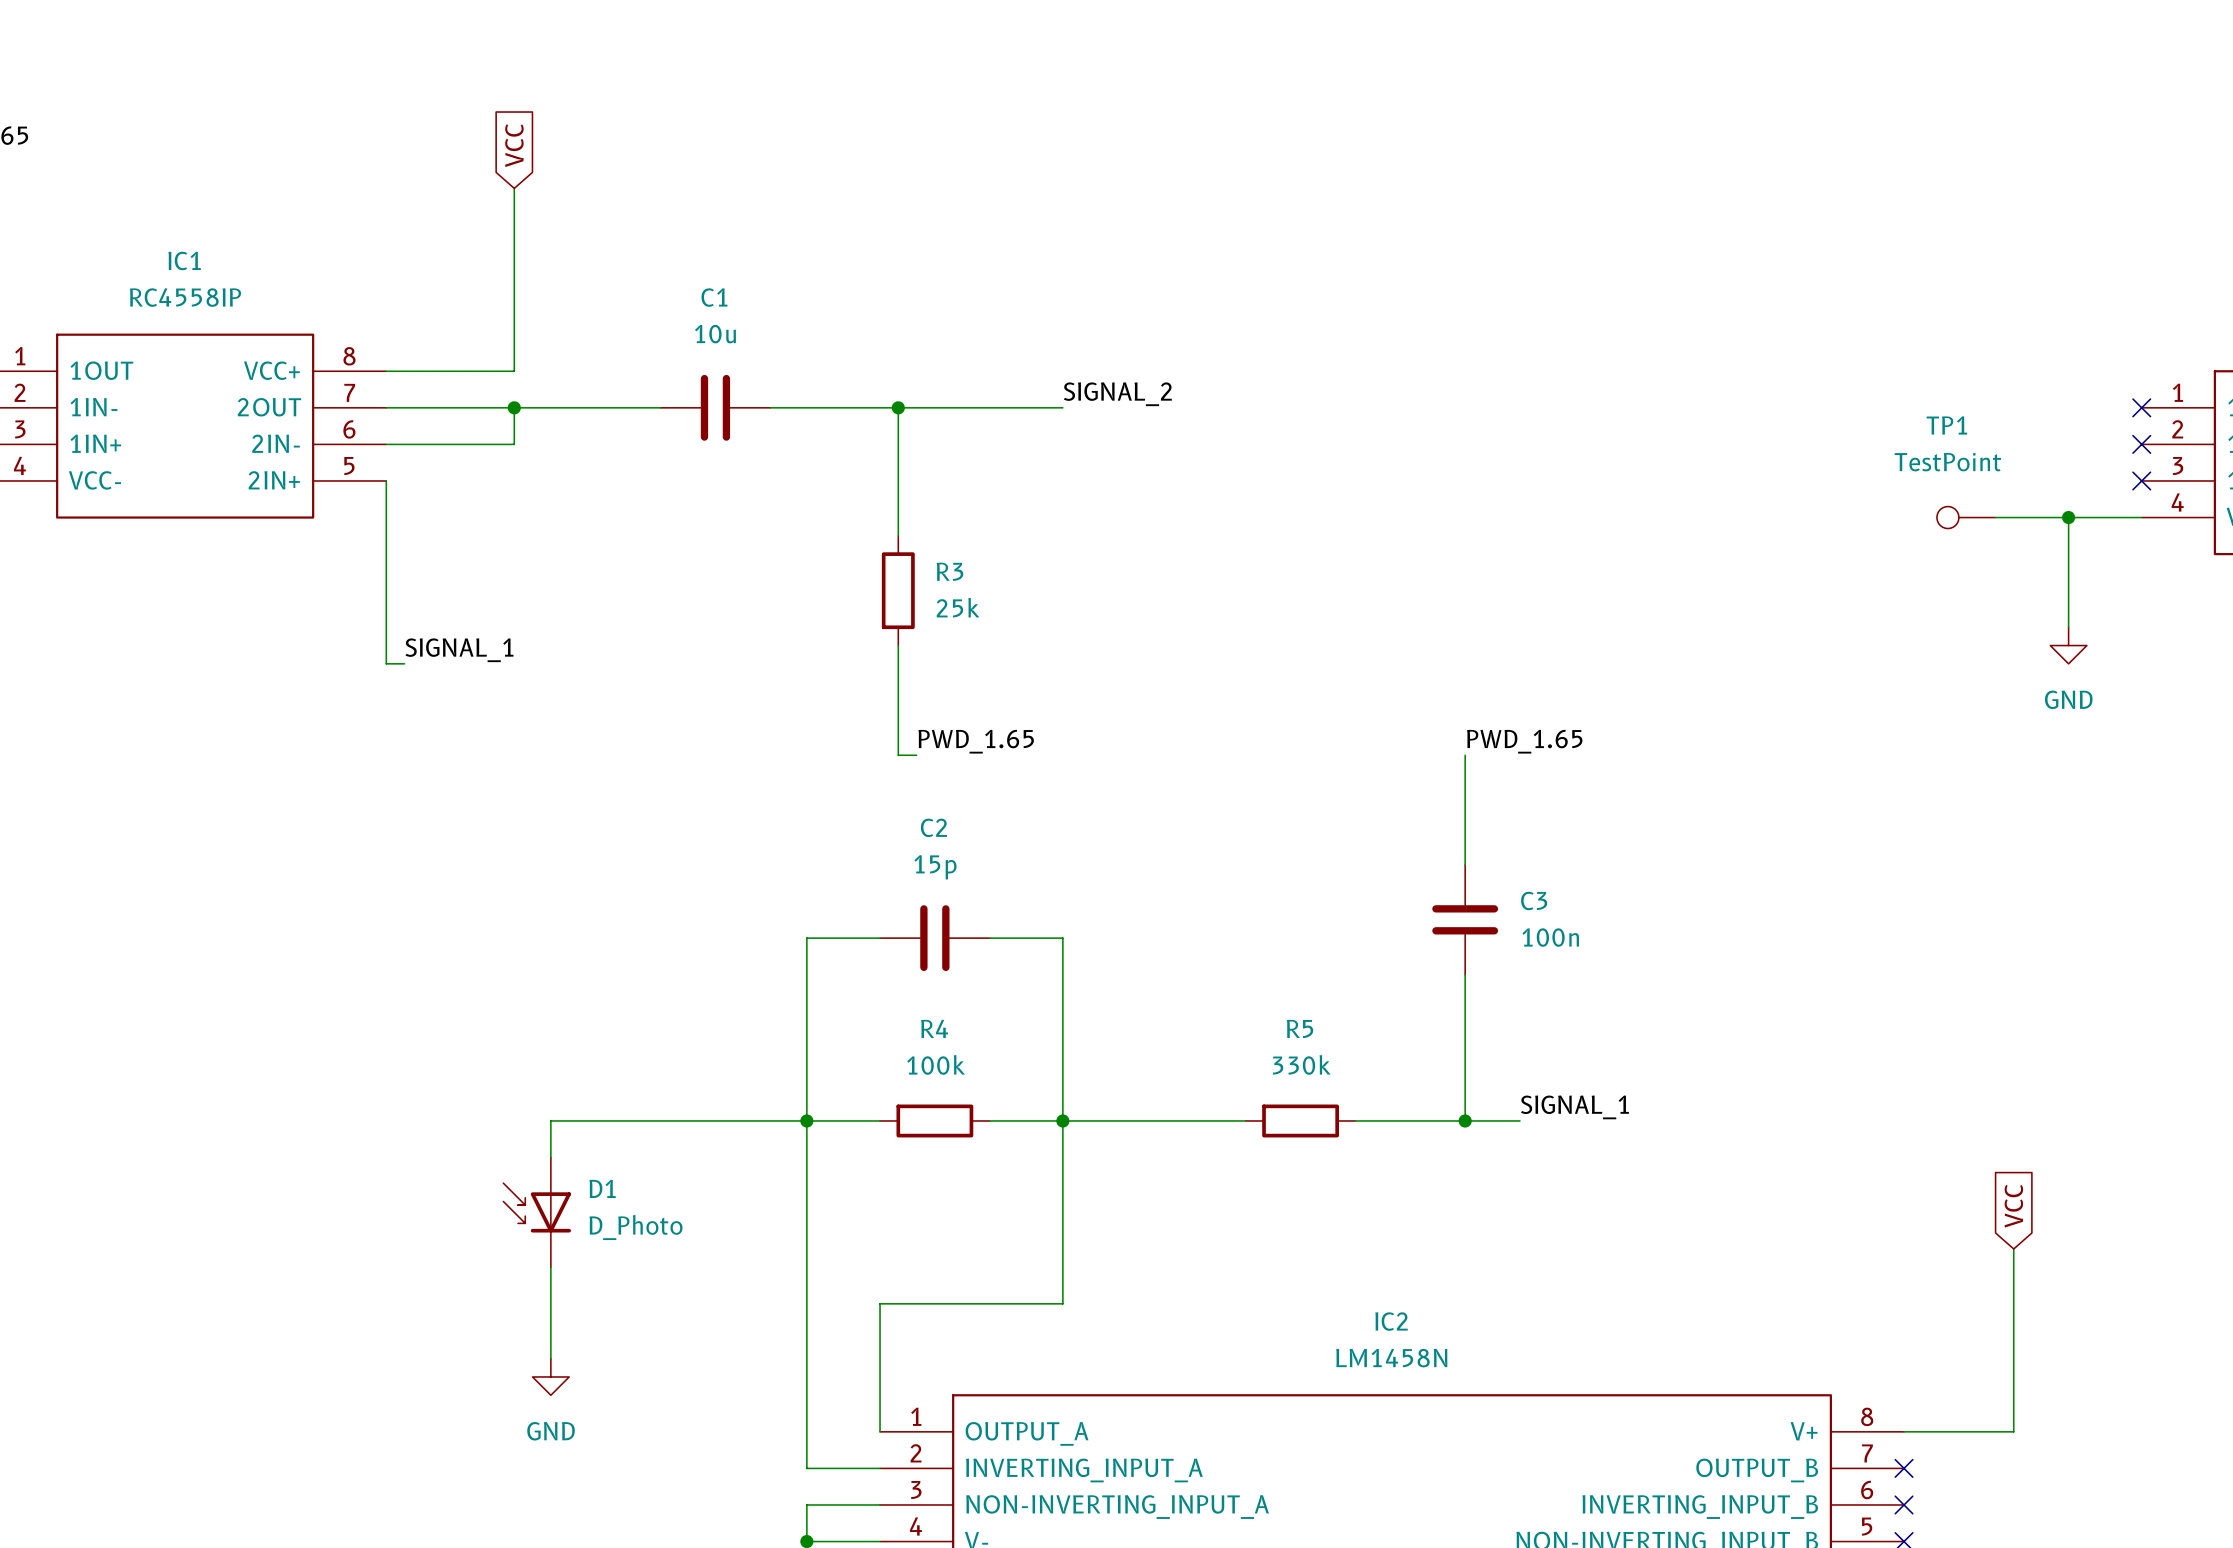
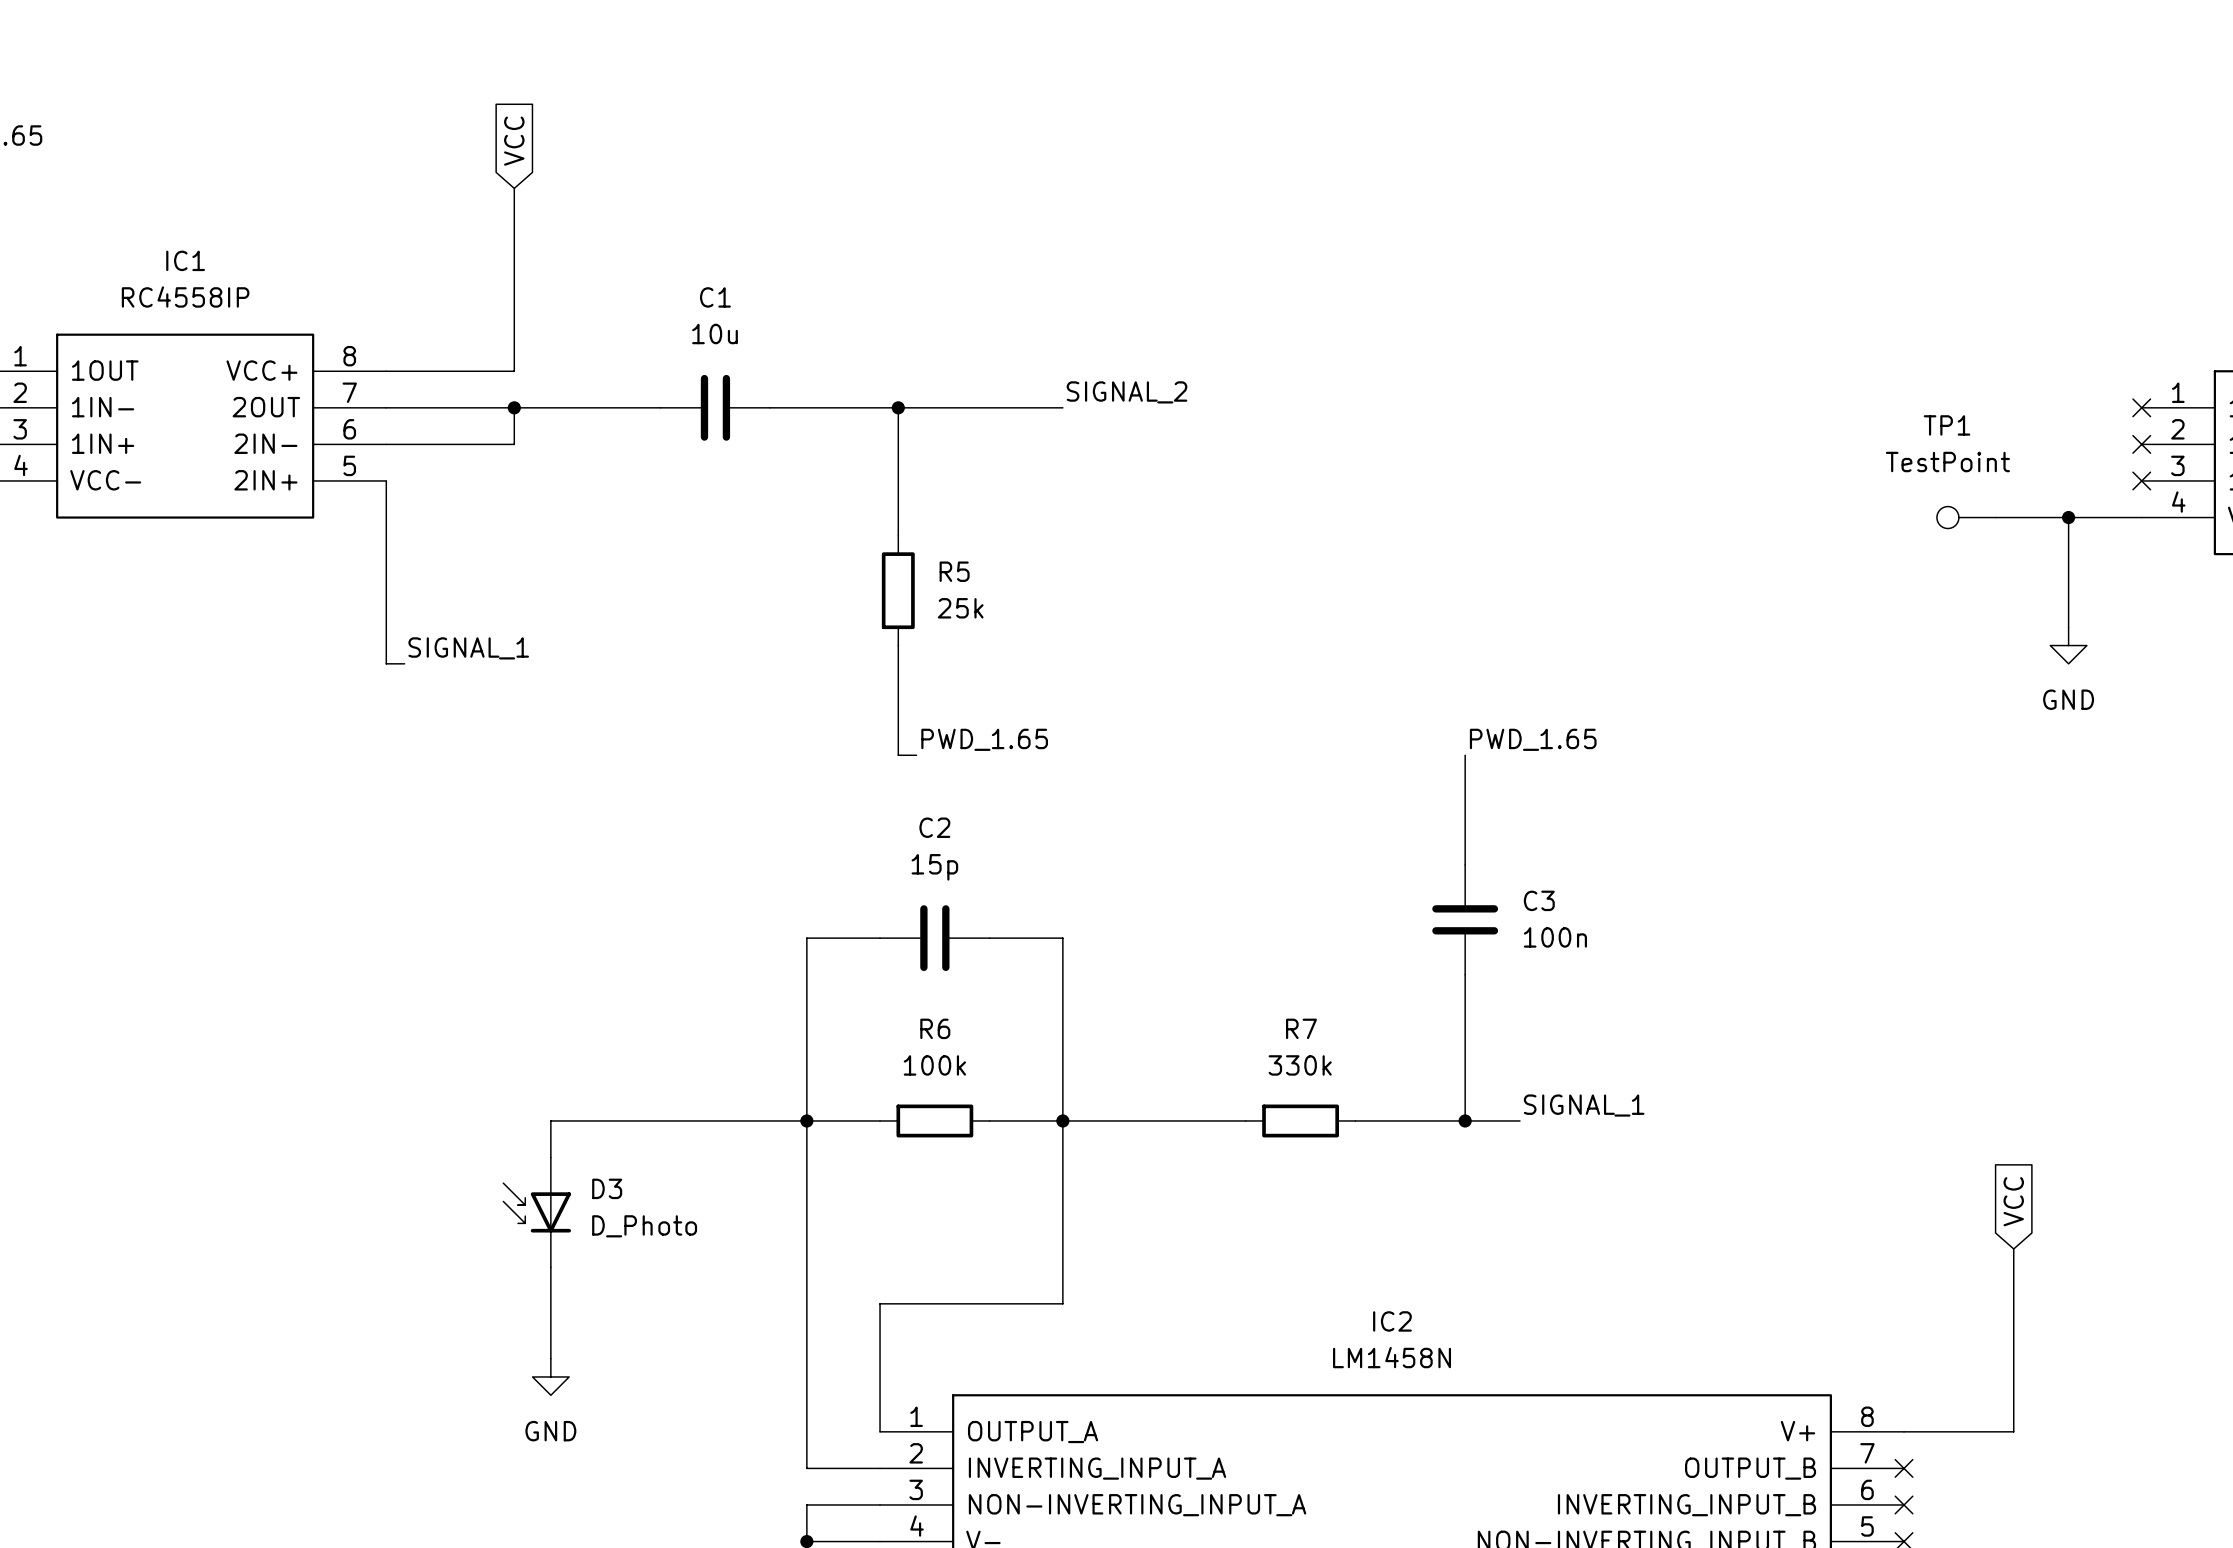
R3 name: R3 (949, 571) -> R5 (954, 571)
R4 name: R4 (934, 1028) -> R6 (935, 1028)
R5 name: R5 (1300, 1028) -> R7 (1301, 1028)
D1 name: D1 (602, 1188) -> D3 (607, 1188)

